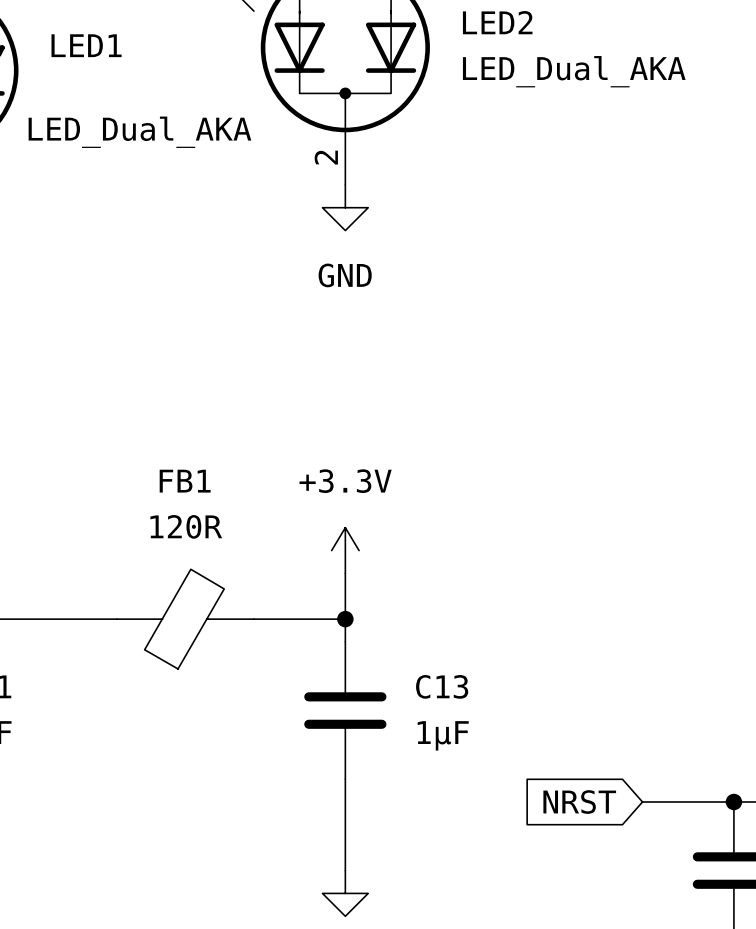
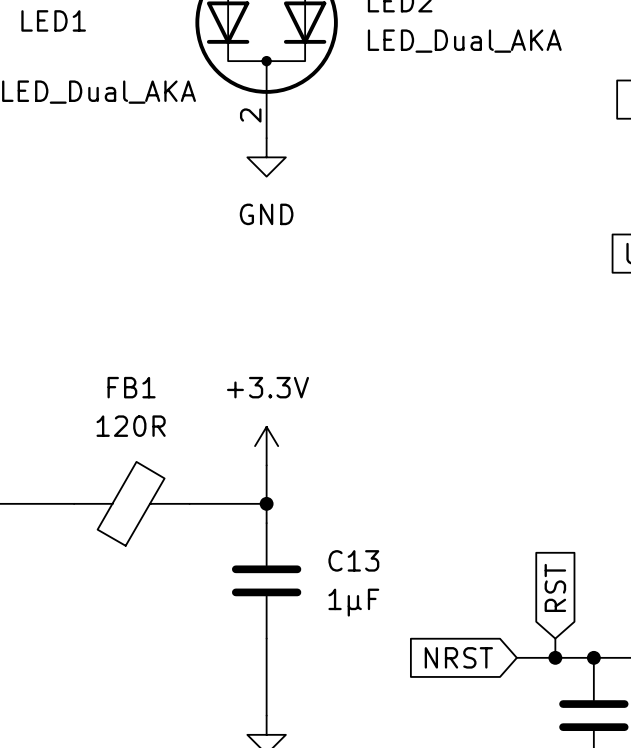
global label: none -> RST (555, 587)
wire: none -> (555, 638) (555, 657)
junction: none -> (555, 657)

